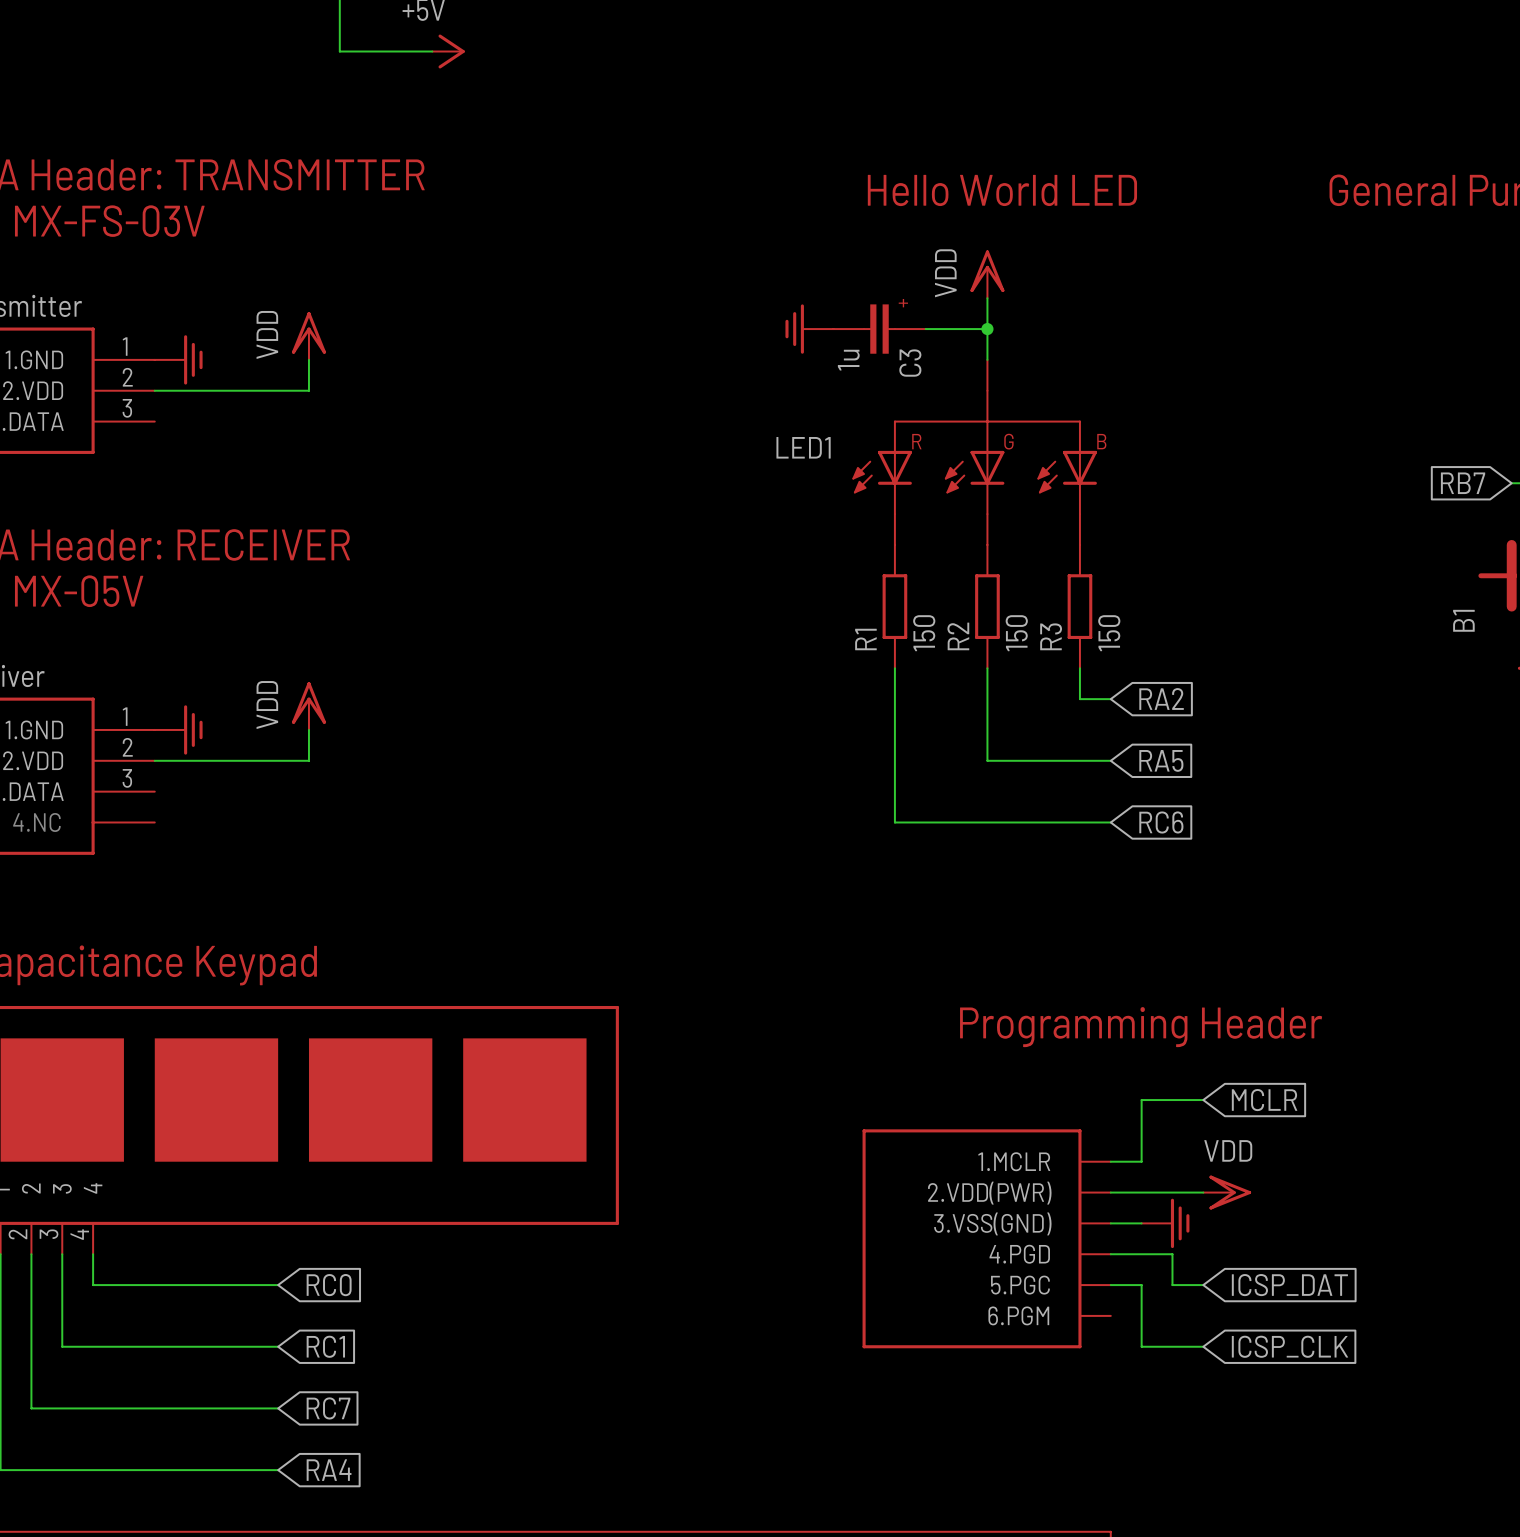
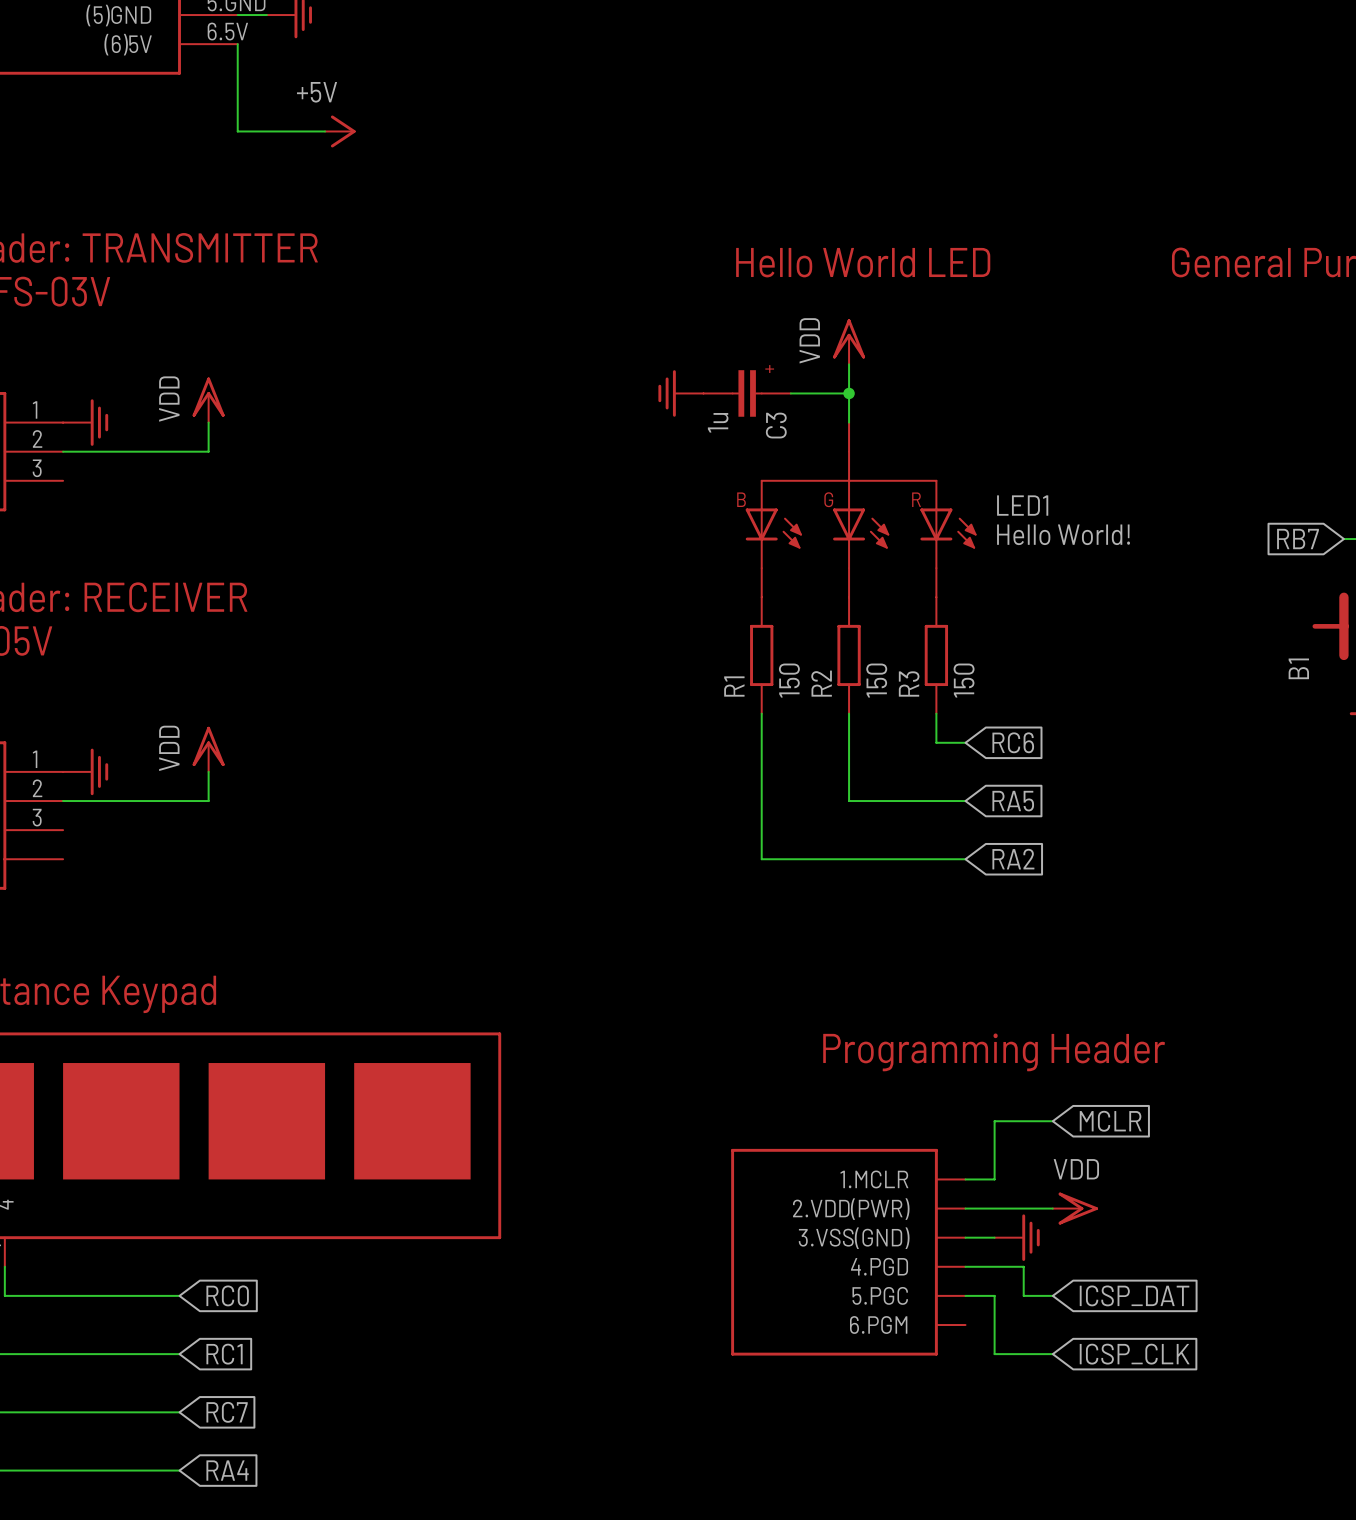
LED1 flip: as is (974, 452) -> left-right (861, 509)
LED1 value: none -> Hello World! (1063, 534)
global label: RA2 (1161, 699) -> RC6 (1013, 742)
global label: RC6 (1161, 822) -> RA2 (1013, 859)

